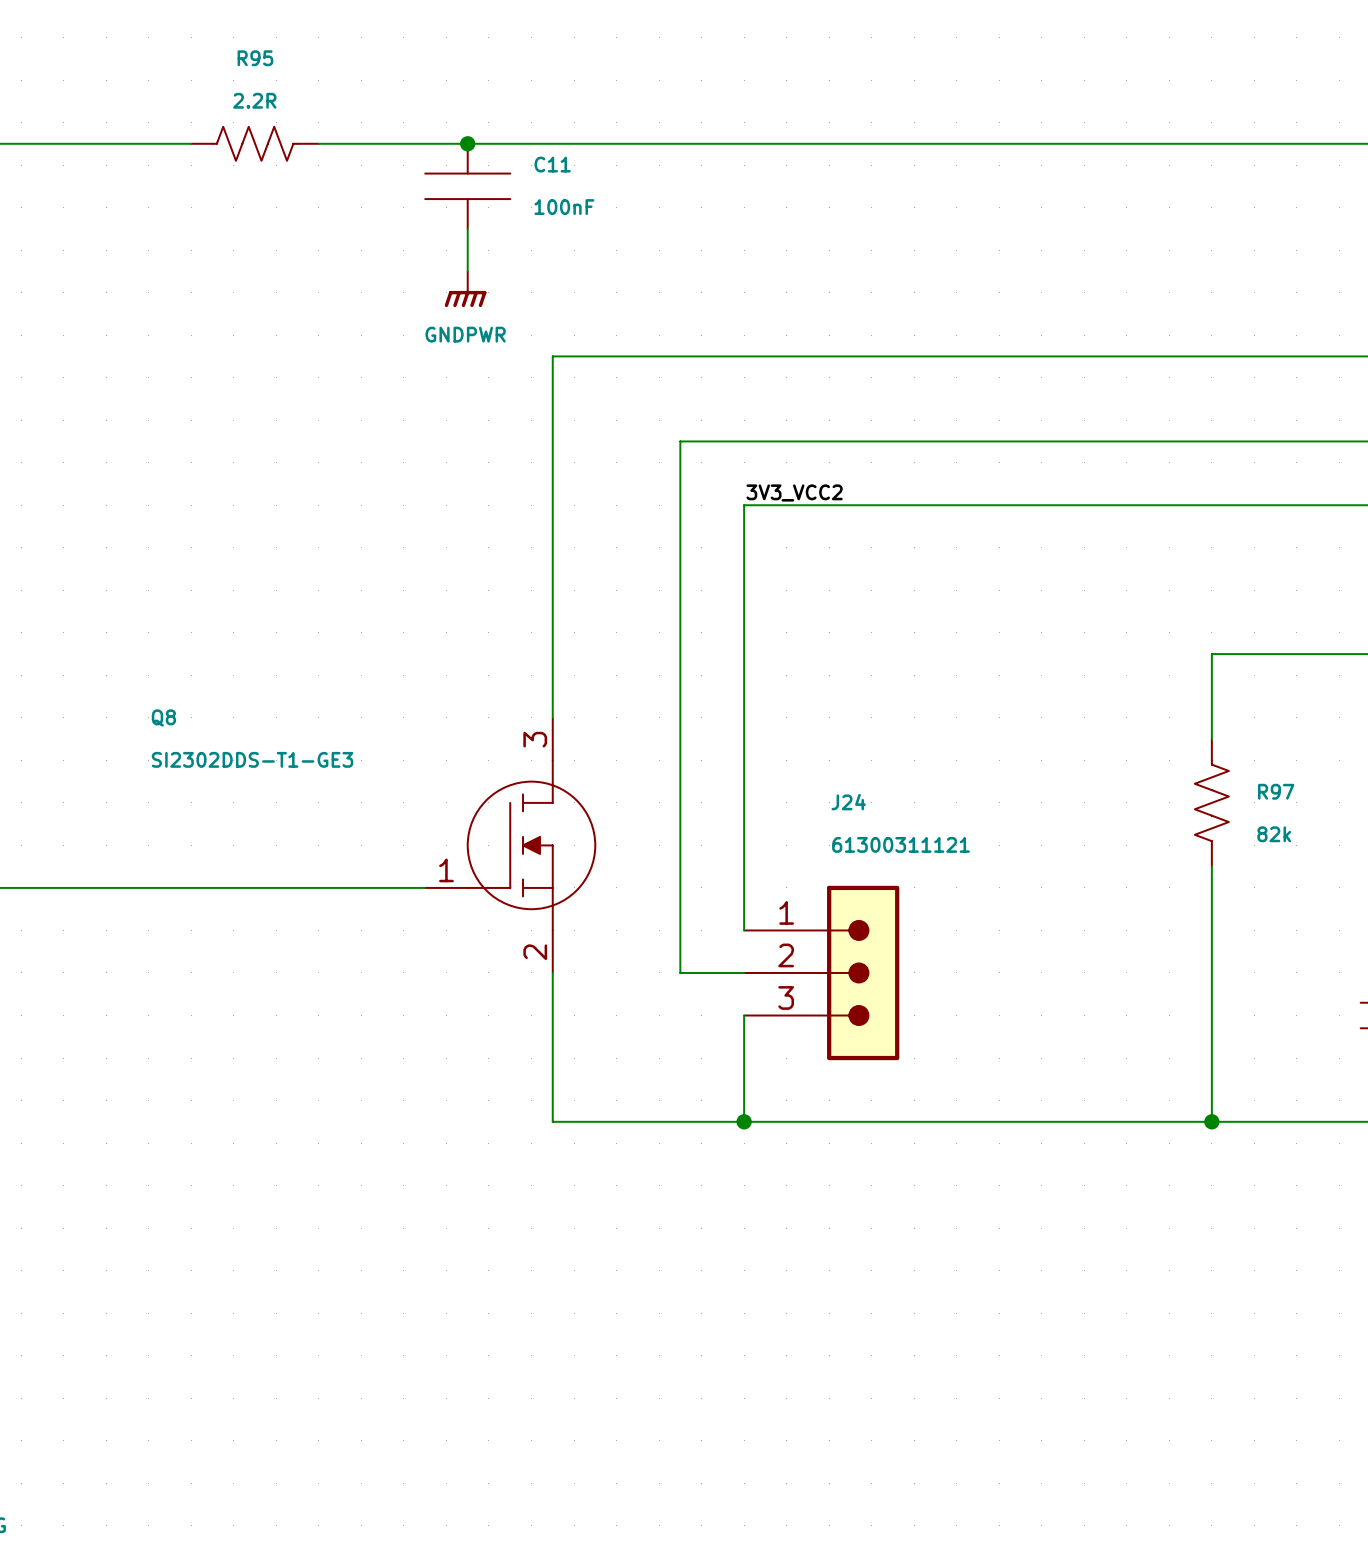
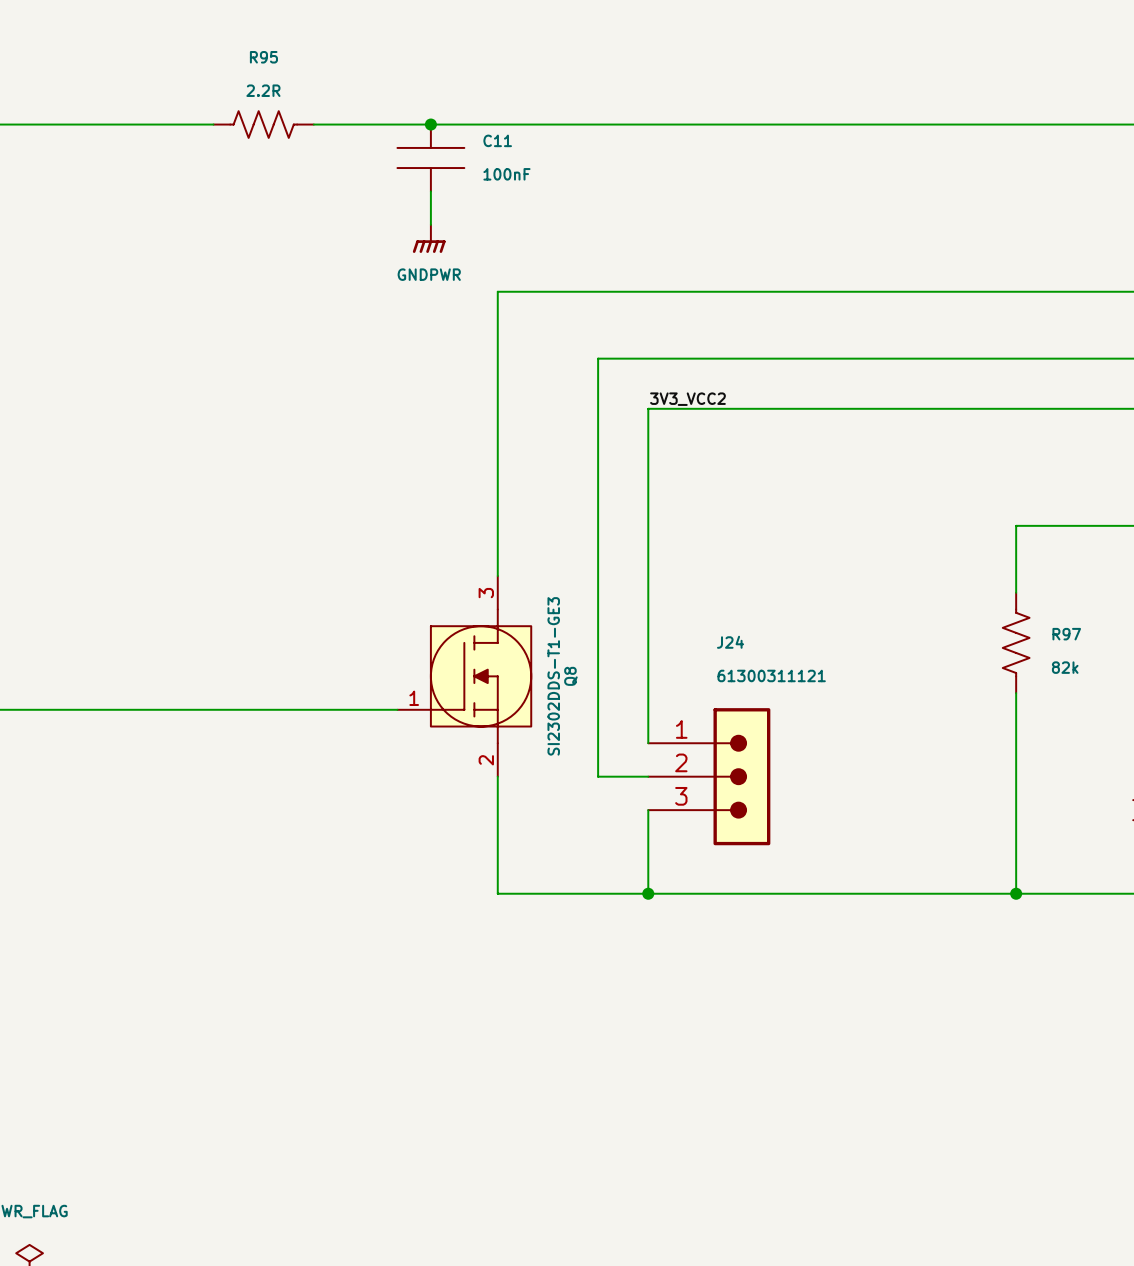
Q8 name position: Q8 (163, 717) -> Q8 (570, 676)
Q8 symbol: [425, 717, 596, 973] -> [397, 576, 532, 777]
Q8 value position: SI2302DDS-T1-GE3 (252, 759) -> SI2302DDS-T1-GE3 (553, 676)

